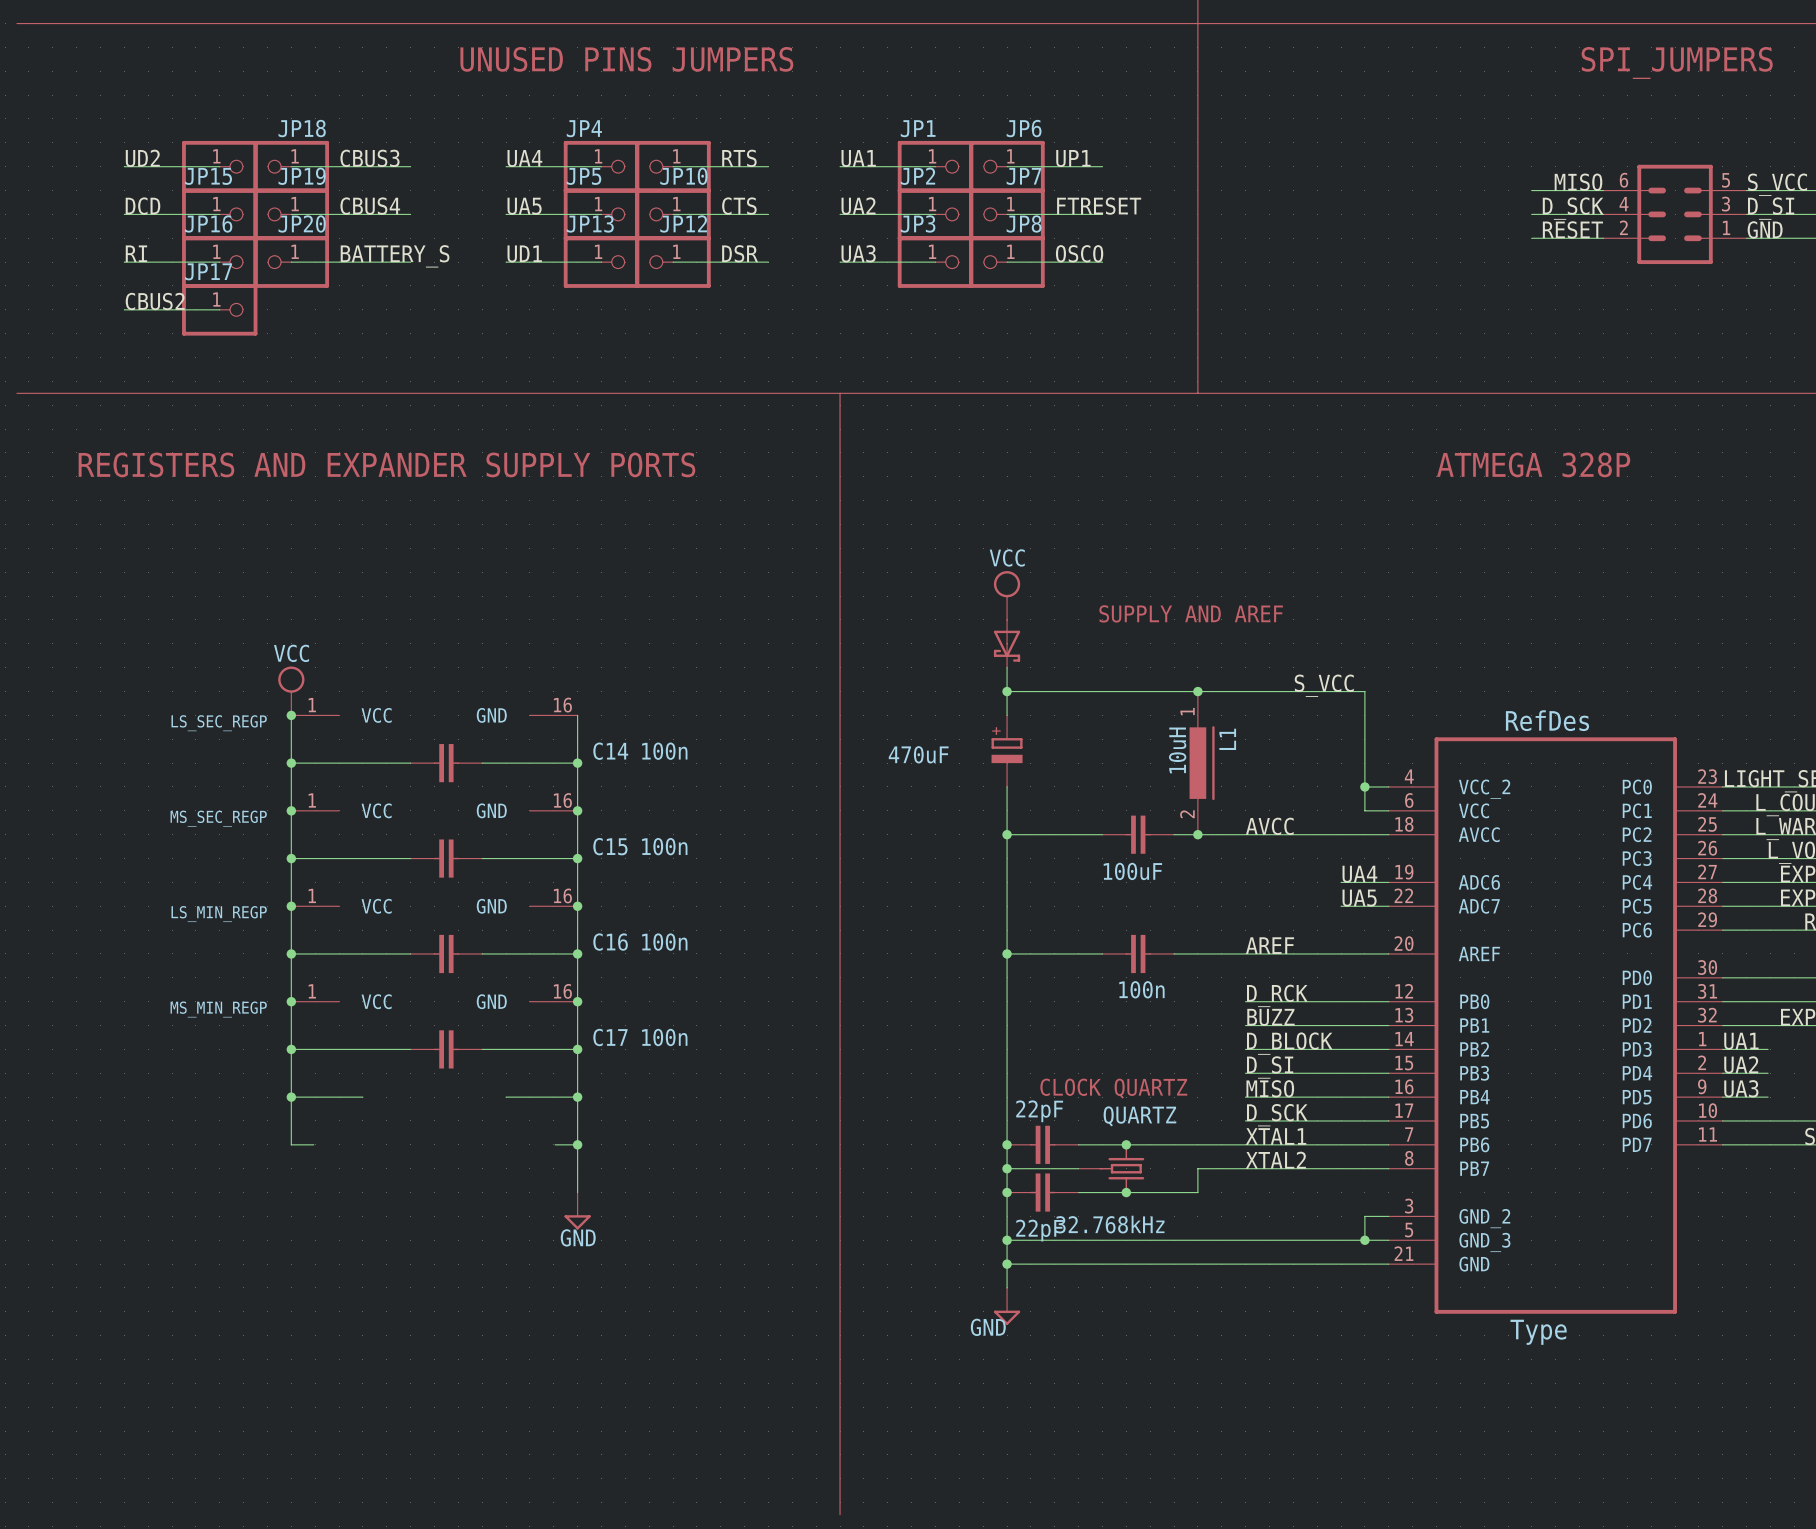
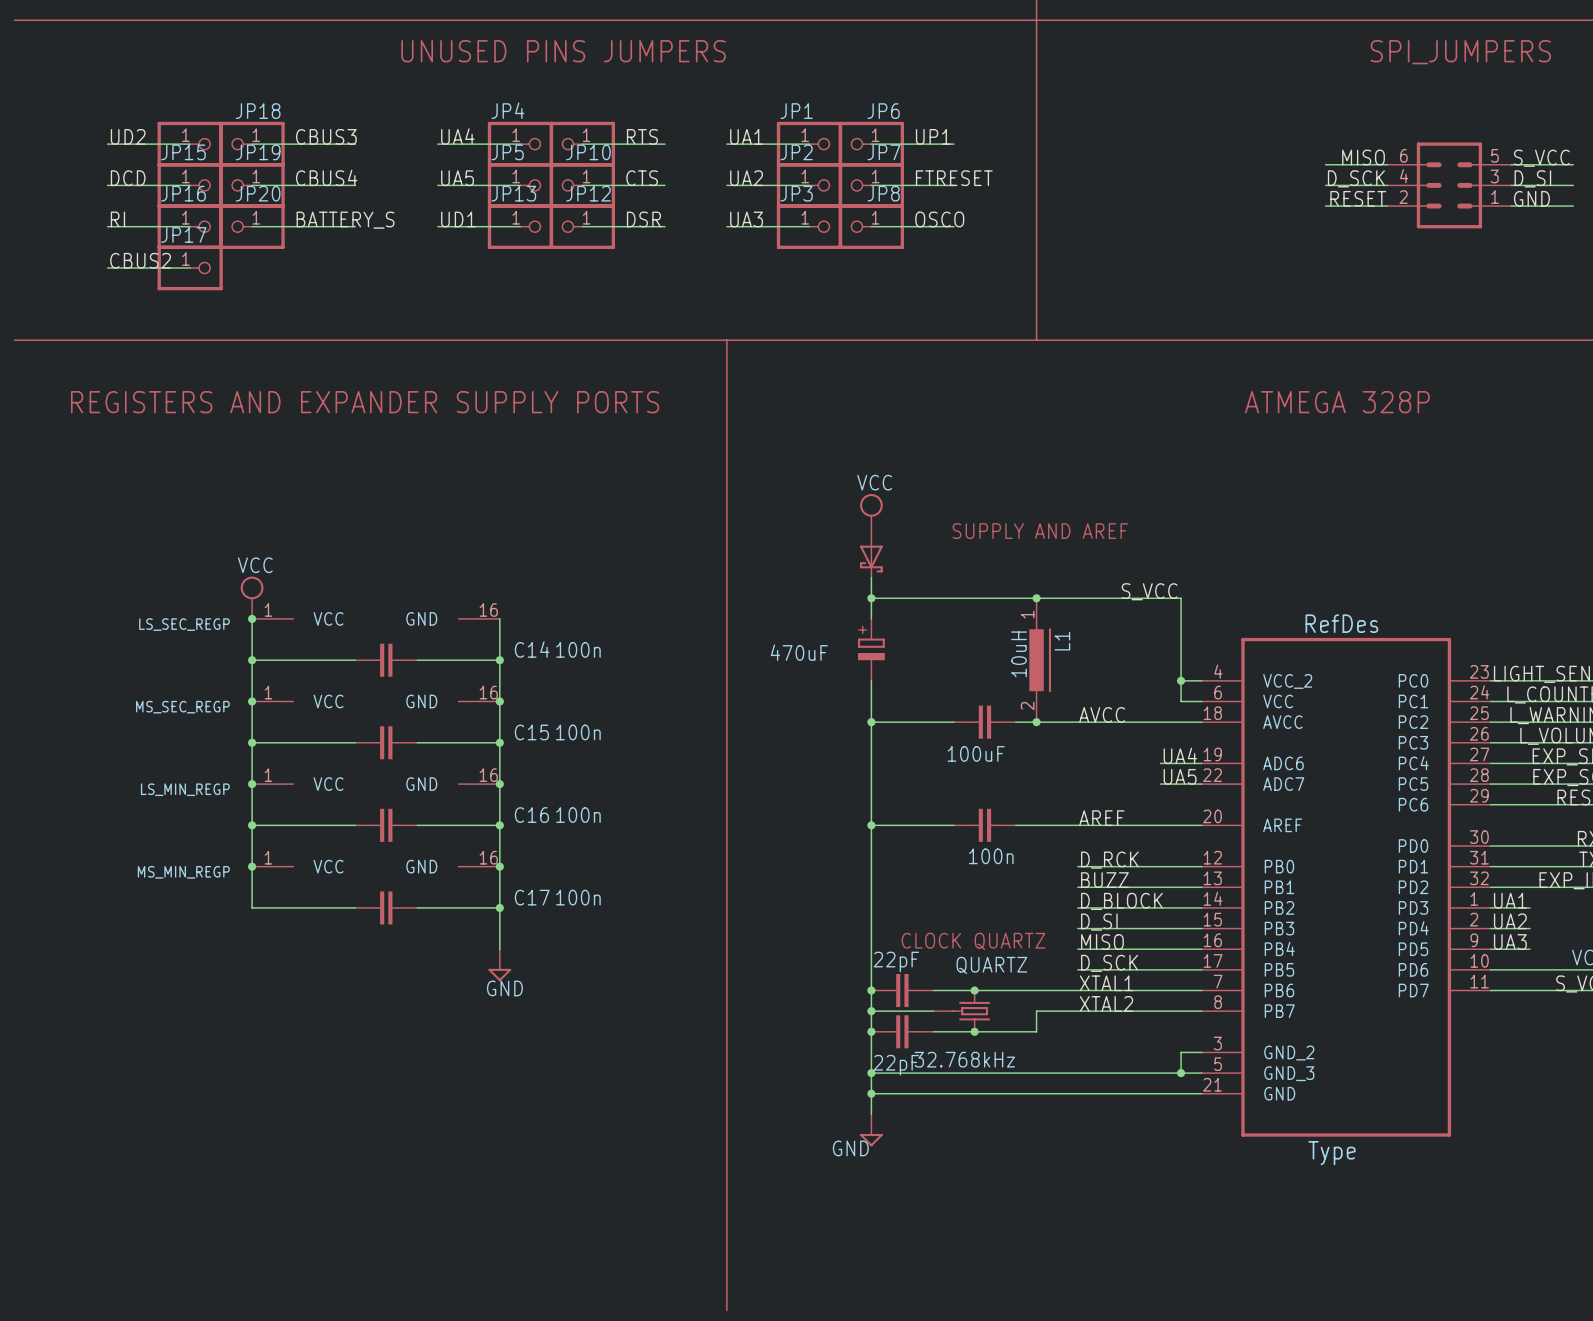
wire: (291, 1049) (291, 1144) (313, 1144) -> none
junction: (291, 1049) -> none
wire: (291, 1097) (362, 1097) -> none
junction: (291, 1097) -> none
wire: (506, 1097) (577, 1097) (577, 1192) -> none
junction: (577, 1097) -> none
wire: (555, 1144) (577, 1144) -> none
junction: (577, 1144) -> none
power symbol position: GND (577, 1211) -> GND (499, 965)

